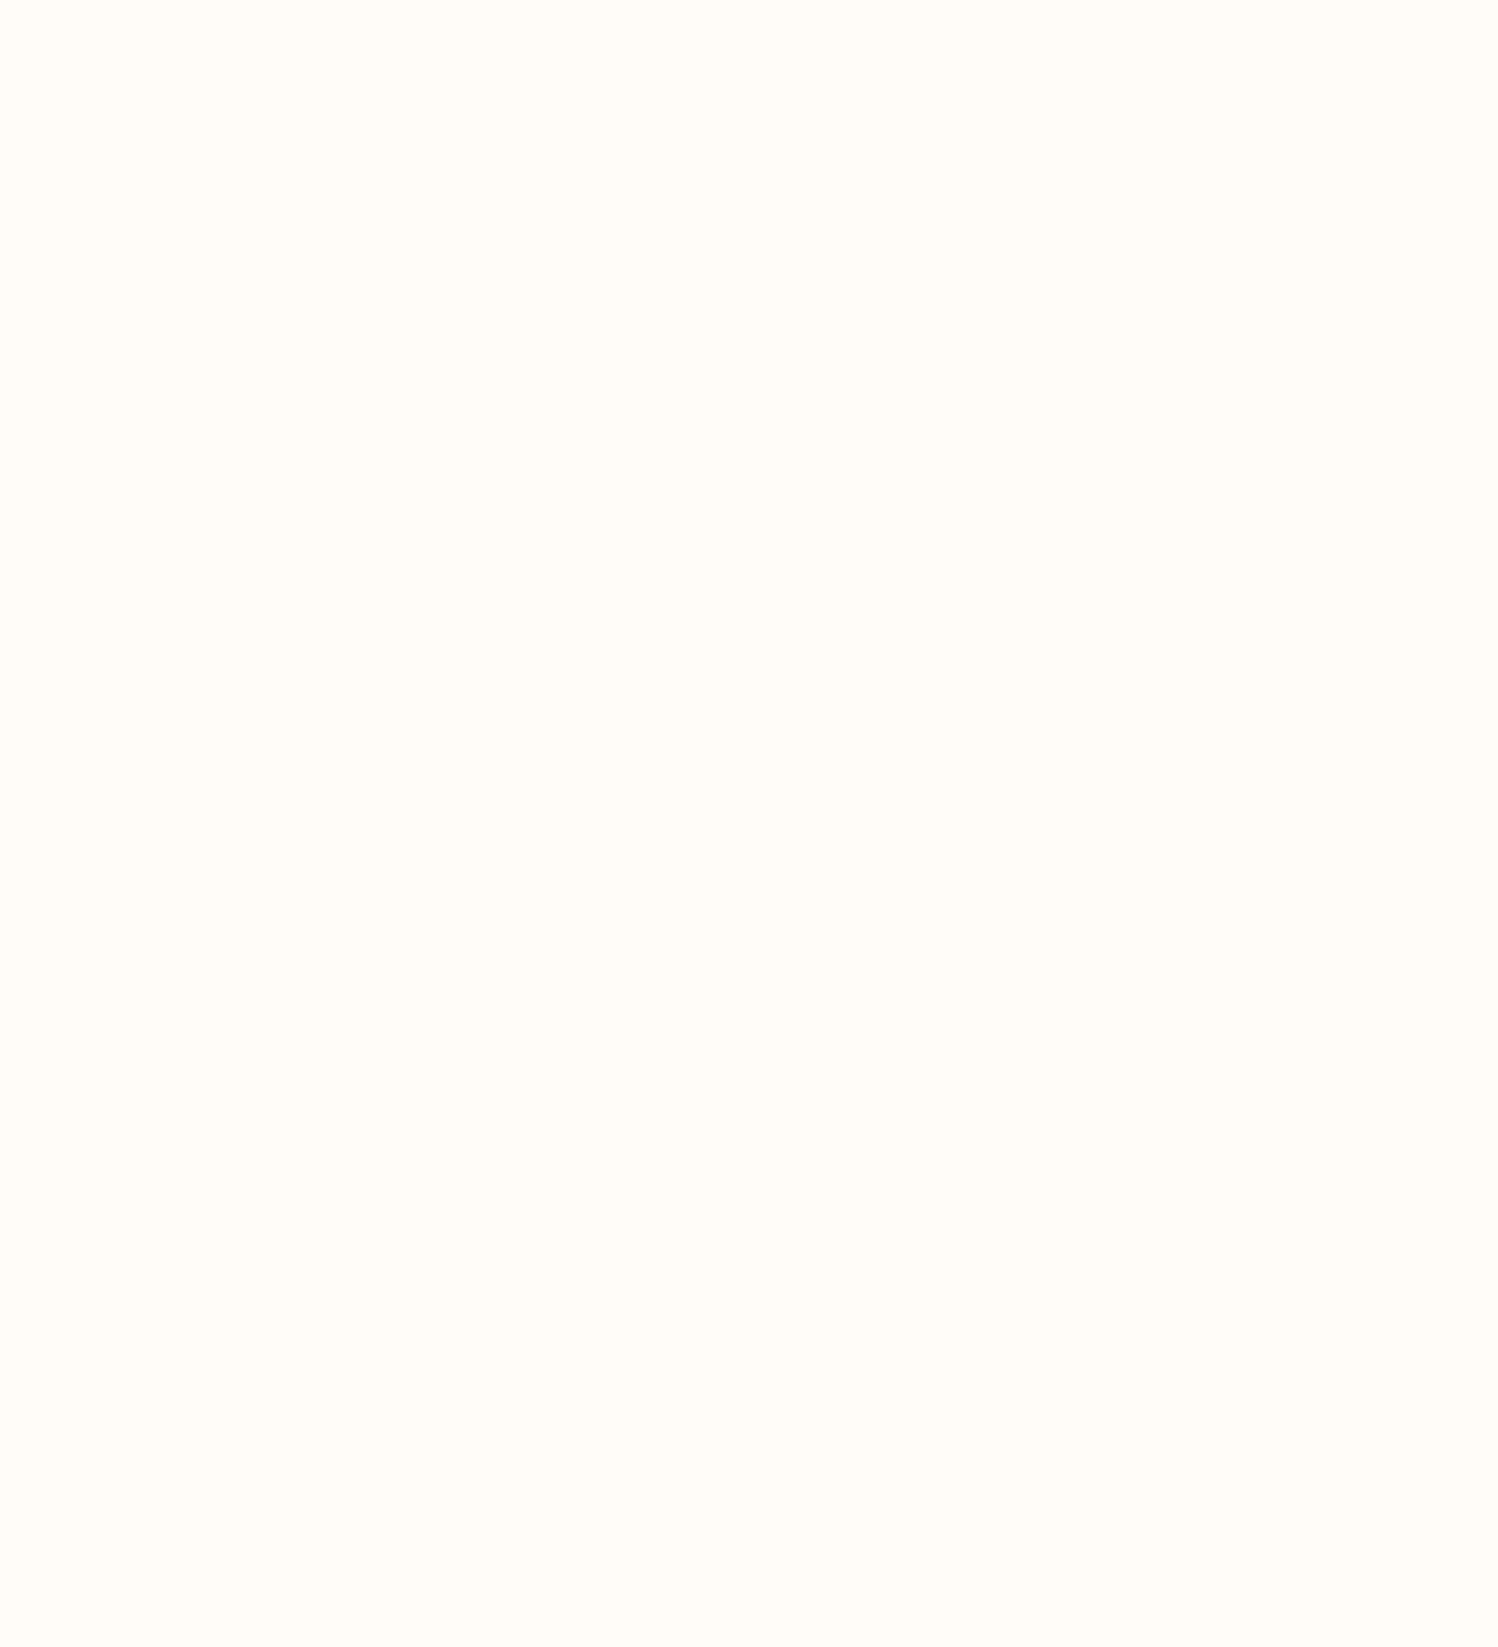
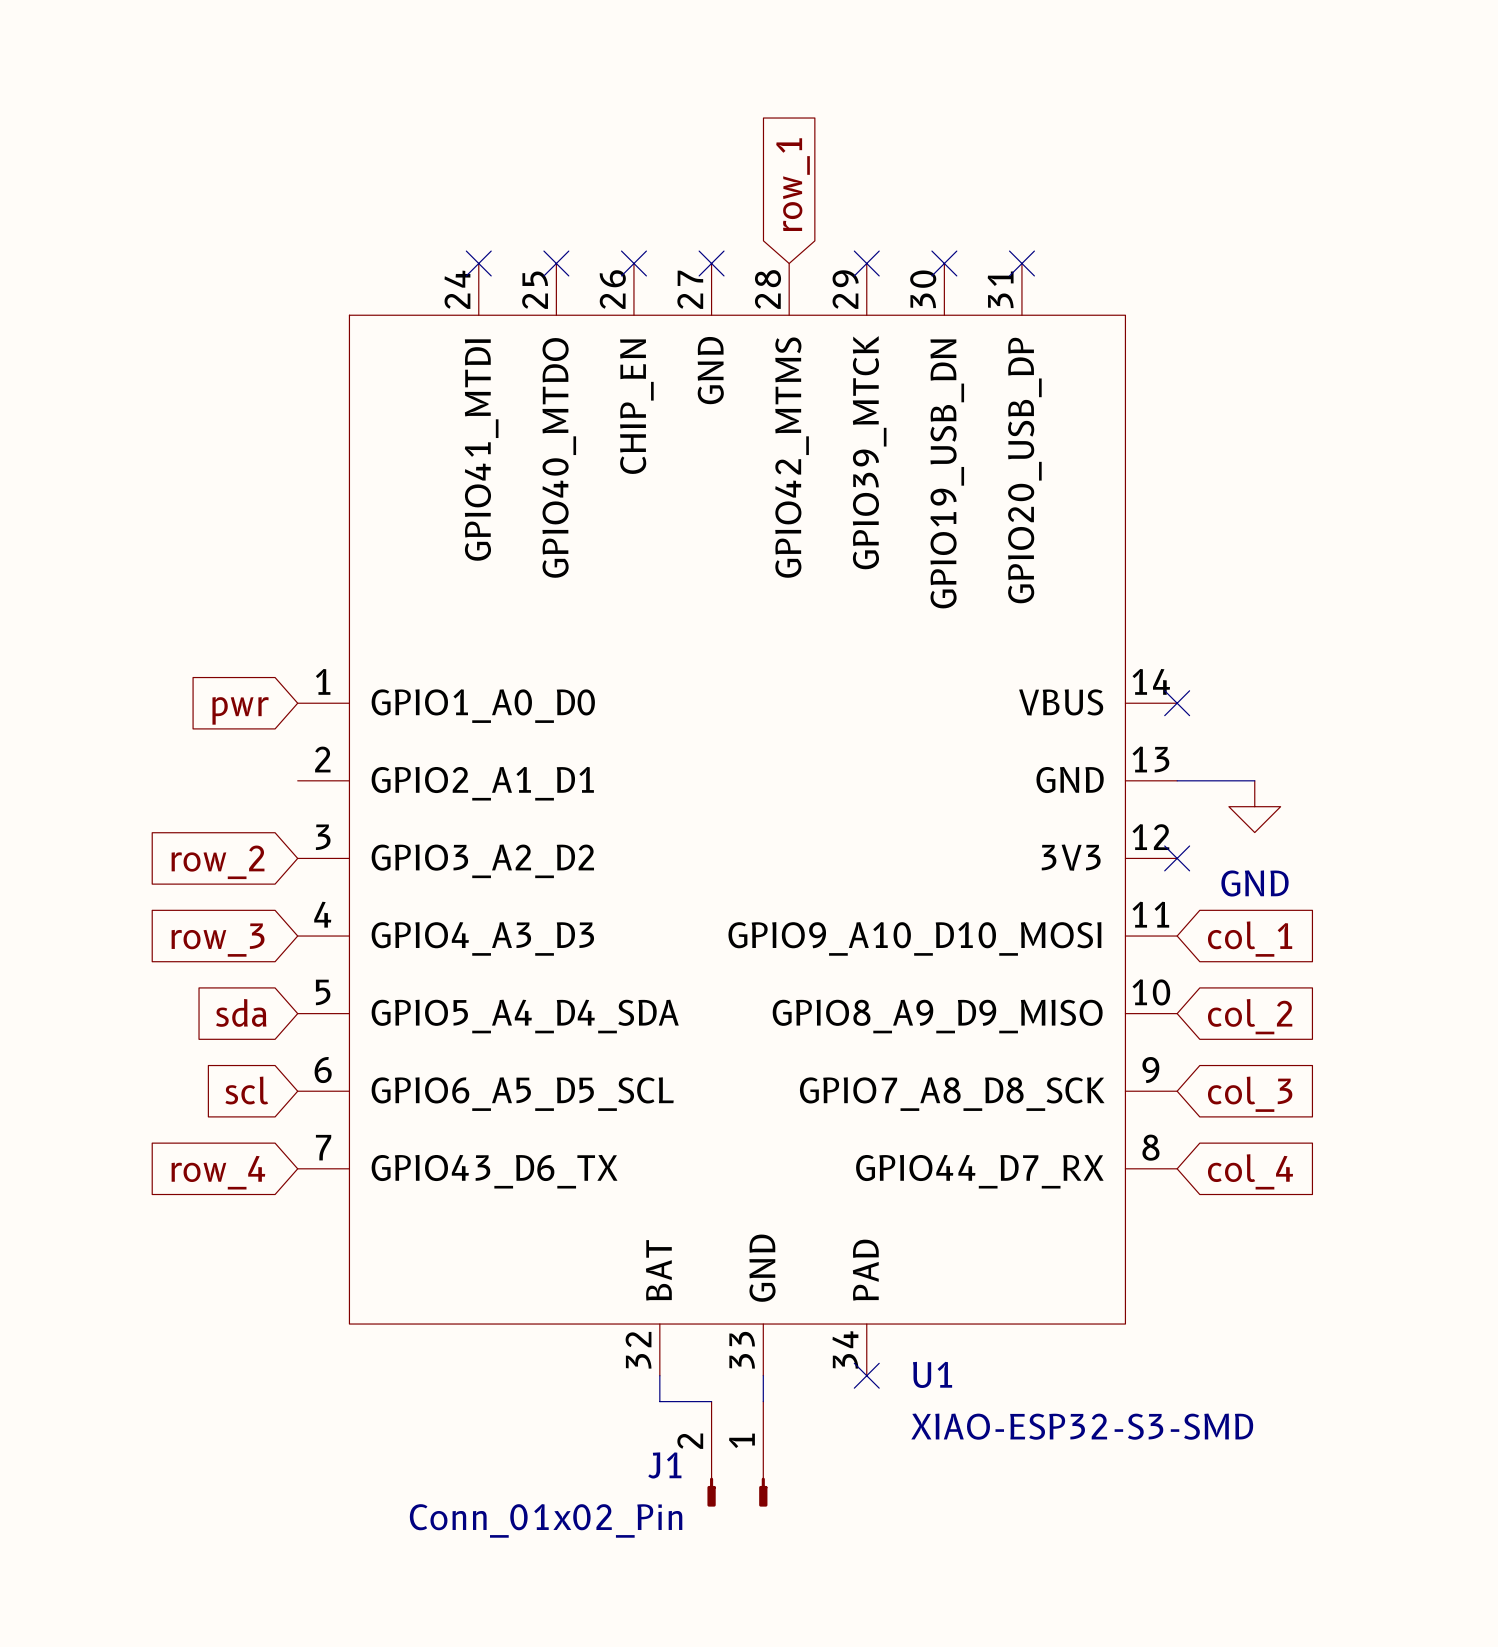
global label: none -> row_1 (793, 184)
no-connect mark: none -> (478, 263)
no-connect mark: none -> (556, 263)
no-connect mark: none -> (633, 263)
no-connect mark: none -> (711, 263)
no-connect mark: none -> (866, 263)
no-connect mark: none -> (944, 263)
no-connect mark: none -> (1021, 263)
no-connect mark: none -> (1177, 703)
global label: none -> pwr (240, 710)
wire: none -> (1177, 780) (1254, 780)
power symbol: none -> GND (1254, 806)
U1: none -> XIAO-ESP32-S3-SMD (737, 819)
no-connect mark: none -> (1177, 858)
global label: none -> row_2 (218, 862)
global label: none -> col_1 (1250, 939)
global label: none -> row_3 (218, 940)
global label: none -> sda (241, 1012)
global label: none -> col_2 (1250, 1016)
global label: none -> scl (246, 1090)
global label: none -> col_3 (1250, 1094)
global label: none -> col_4 (1250, 1171)
global label: none -> row_4 (218, 1172)
wire: none -> (659, 1375) (659, 1401) (711, 1401)
wire: none -> (763, 1375) (763, 1401)
no-connect mark: none -> (866, 1375)
J1: none -> Conn_01x02_Pin (737, 1454)

